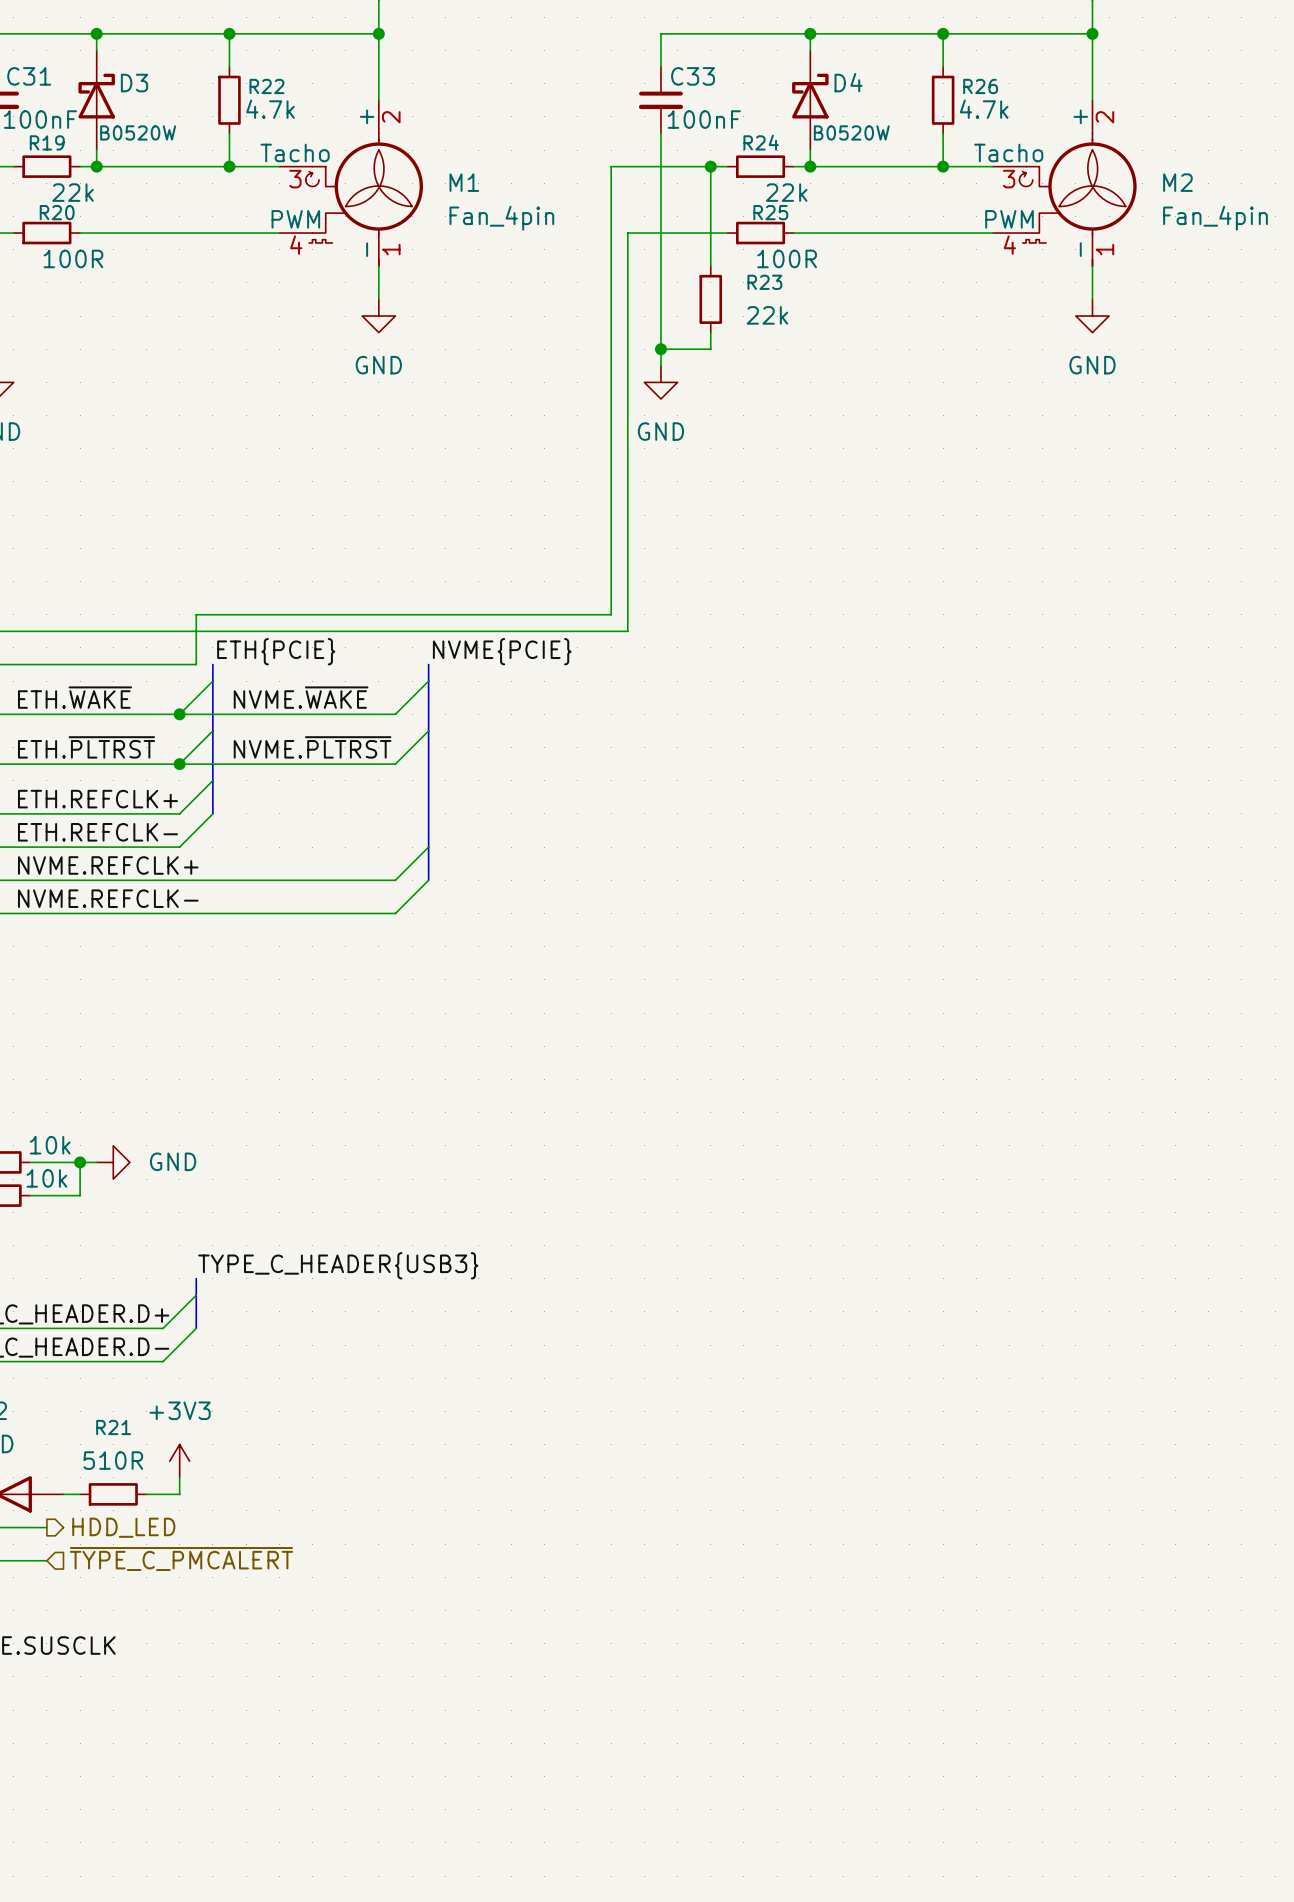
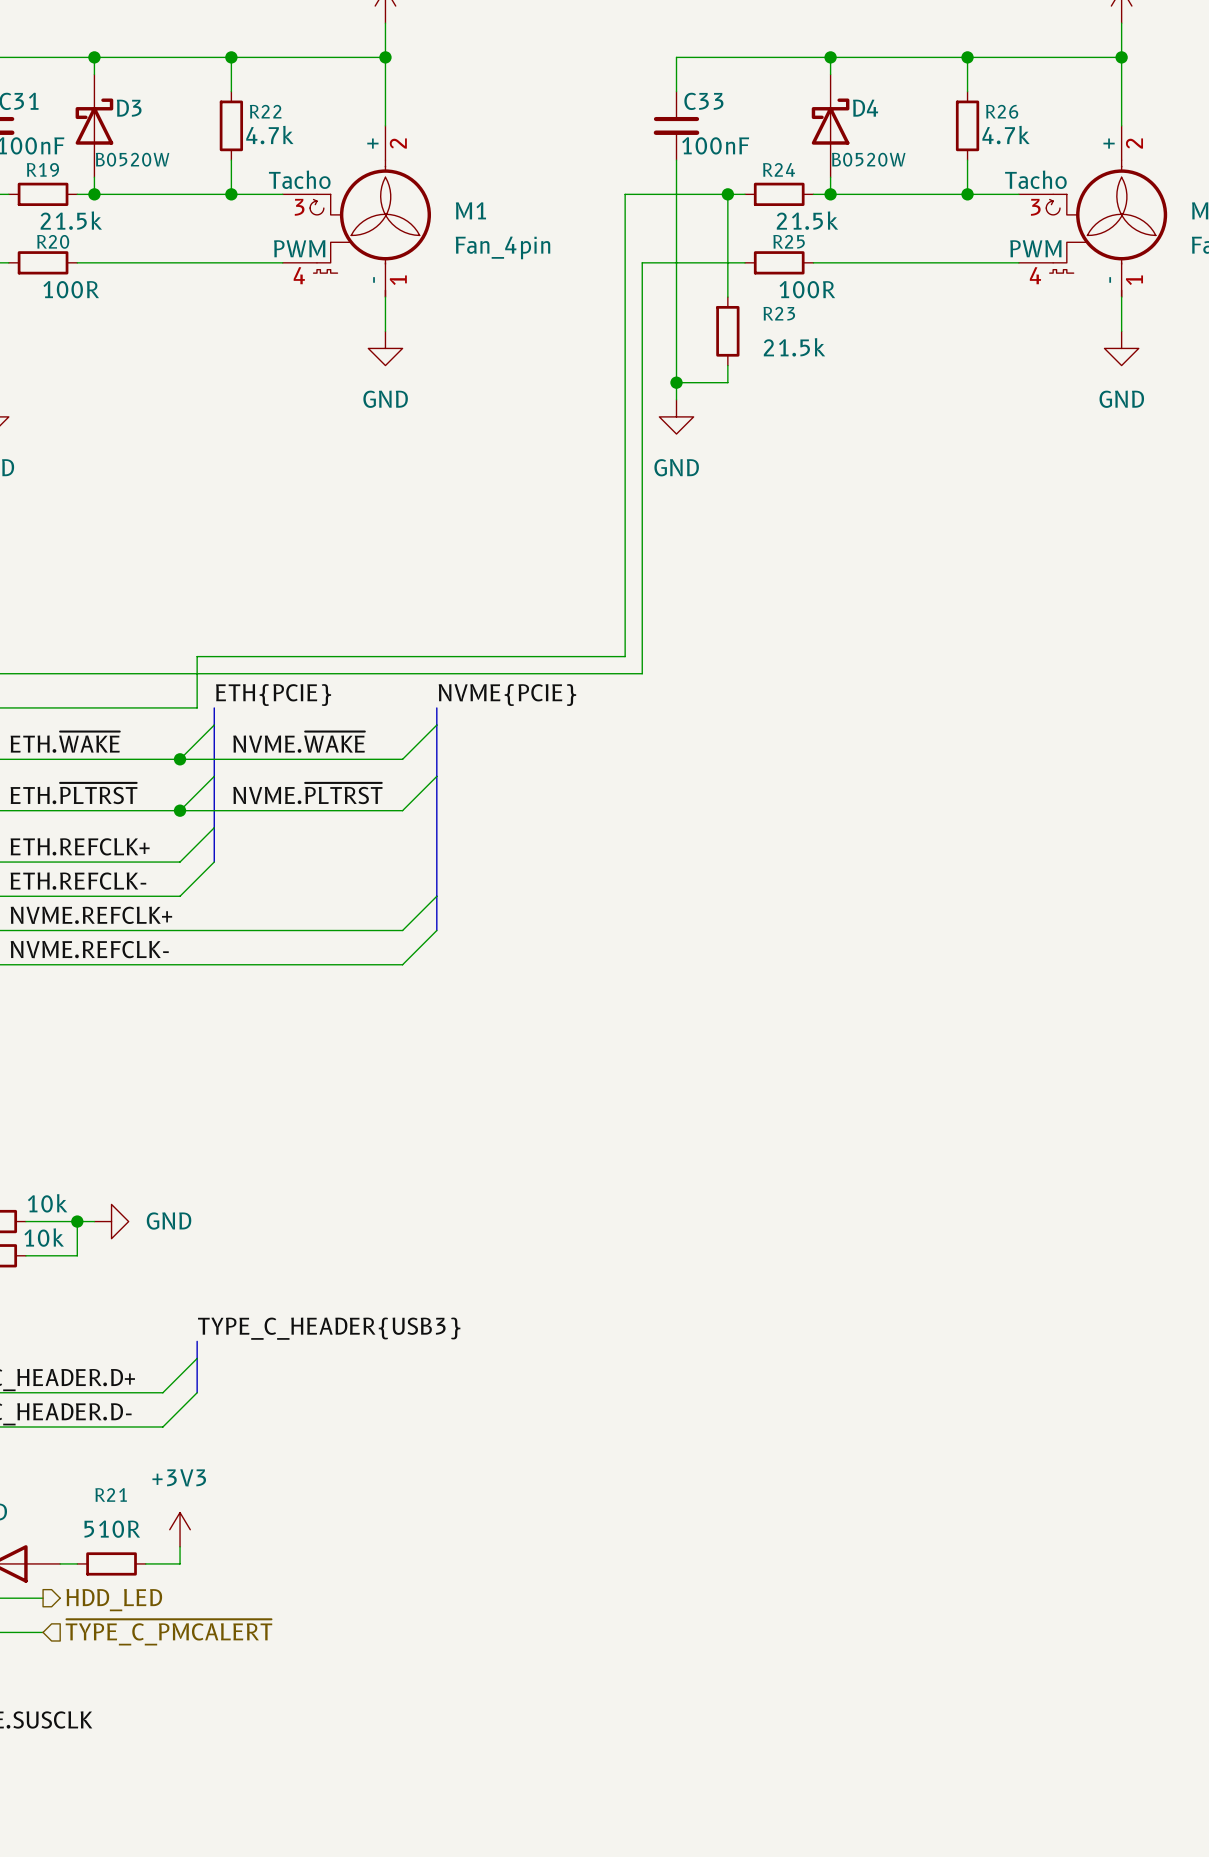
R19 value: 22k (73, 192) -> 21.5k (71, 220)
R24 value: 22k (786, 192) -> 21.5k (807, 220)
R23 value: 22k (767, 315) -> 21.5k (794, 347)

